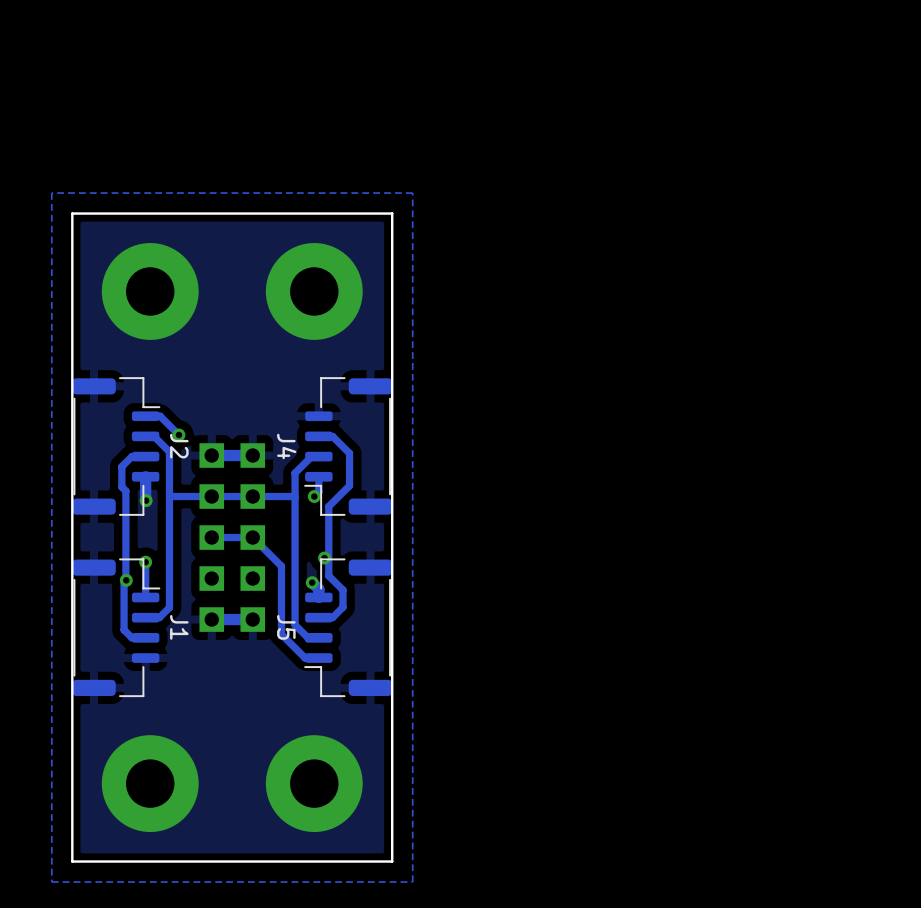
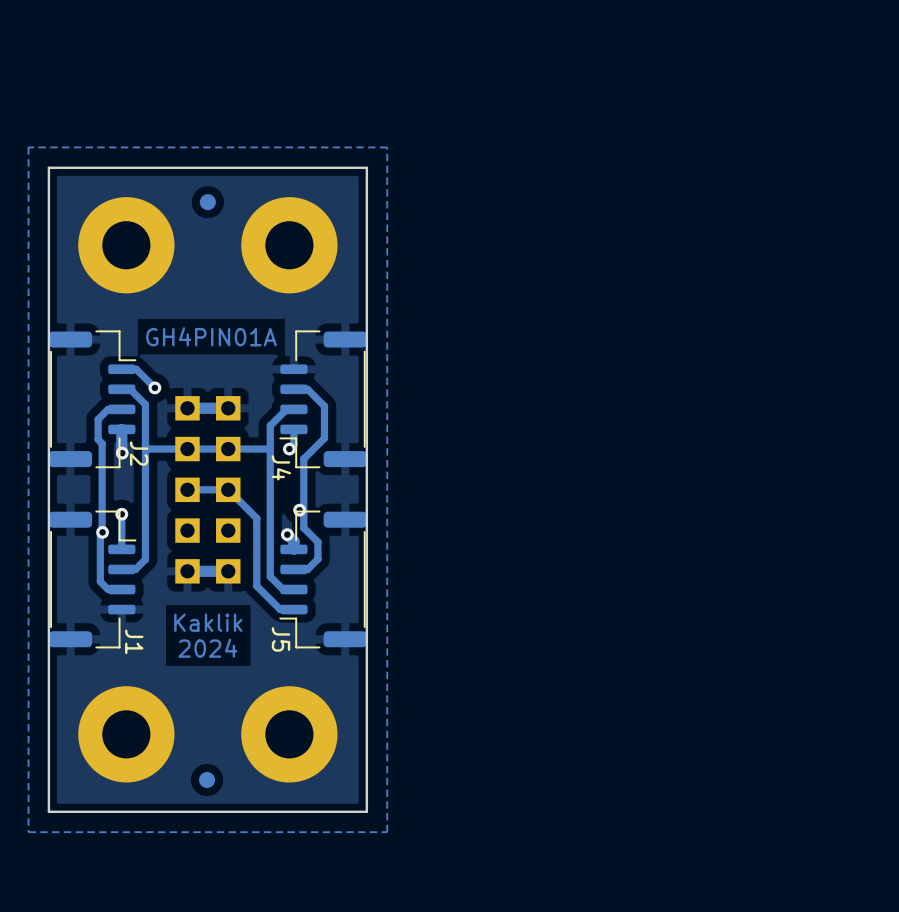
part: none -> (207, 202)
text: none -> GH4PIN01A (211, 336)
J2 name position: J2 (179, 446) -> J2 (139, 453)
J4 name position: J4 (286, 446) -> J4 (281, 467)
J1 name position: J1 (179, 627) -> J1 (134, 641)
J5 name position: J5 (286, 627) -> J5 (281, 639)
text: none -> Kaklik (208, 622)
text: none -> 2024 (207, 648)
part: none -> (207, 780)

